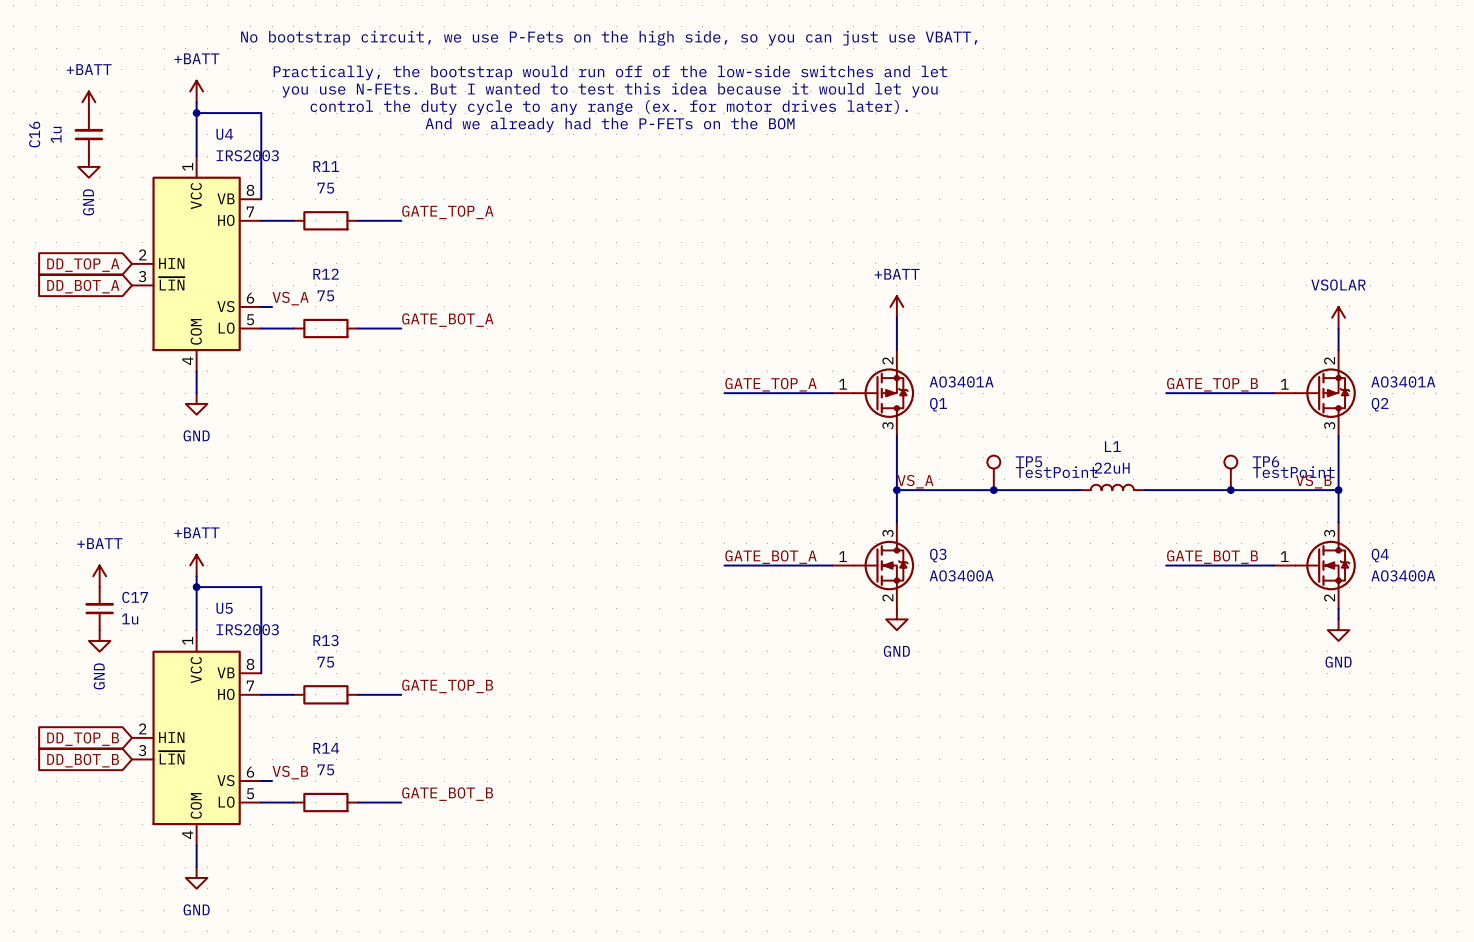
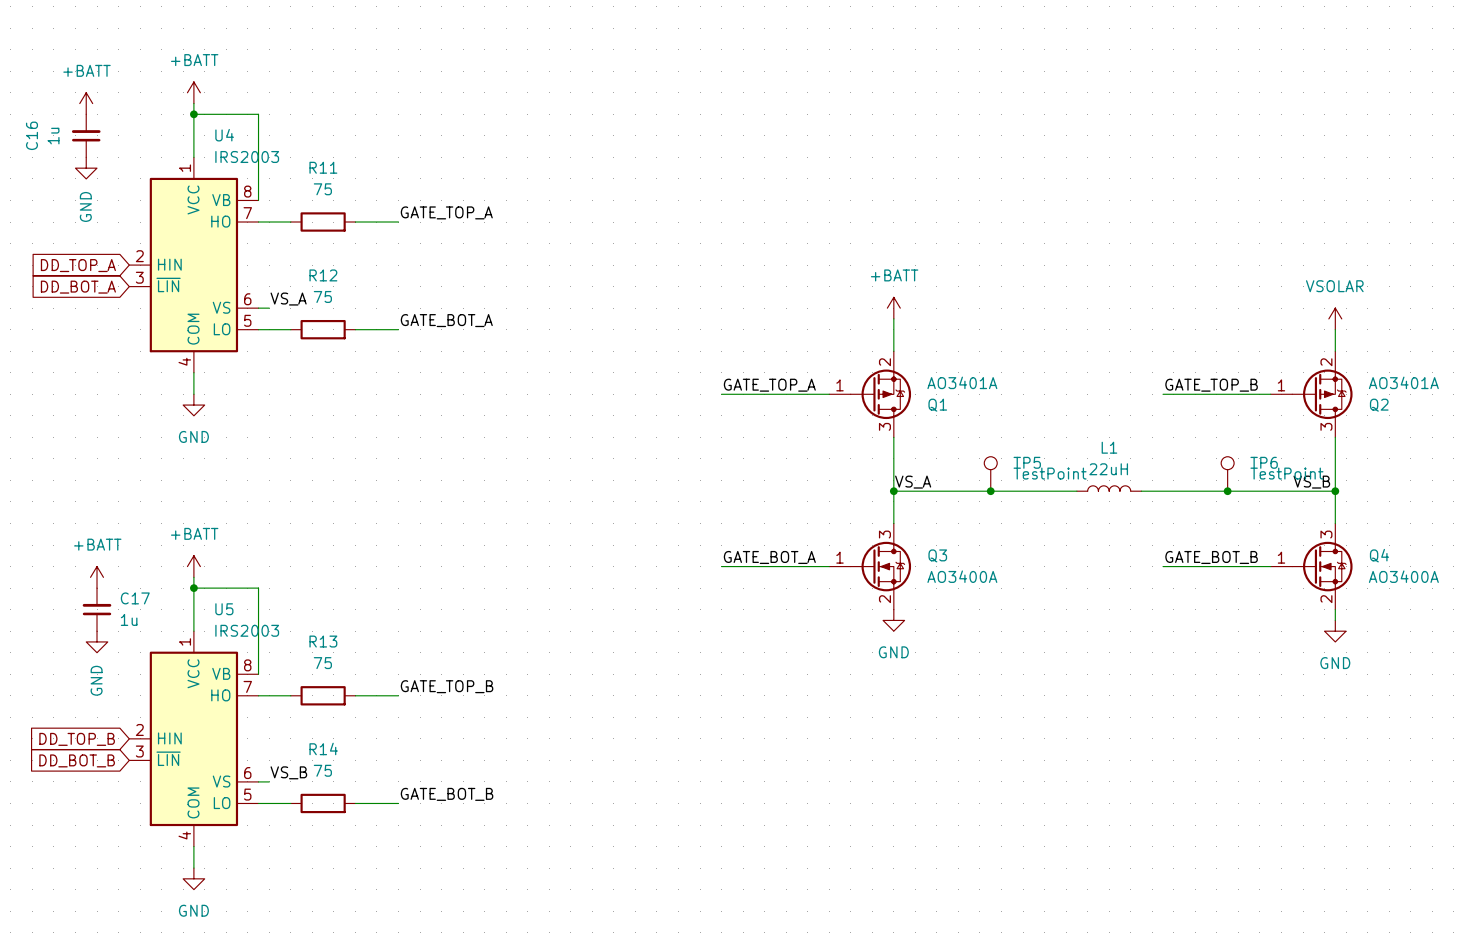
text: No bootstrap circuit, we use P-Fets on the high side, so you can just use VBATT, (609, 38) -> none
text: Practically, the bootstrap would run off of the low-side switches and let (610, 72) -> none
text: you use N-FEts. But I wanted to test this idea because it would let you (609, 90) -> none
text: control the duty cycle to any range (ex. for motor drives later). (609, 107) -> none
text: And we already had the P-FETs on the BOM (610, 124) -> none

